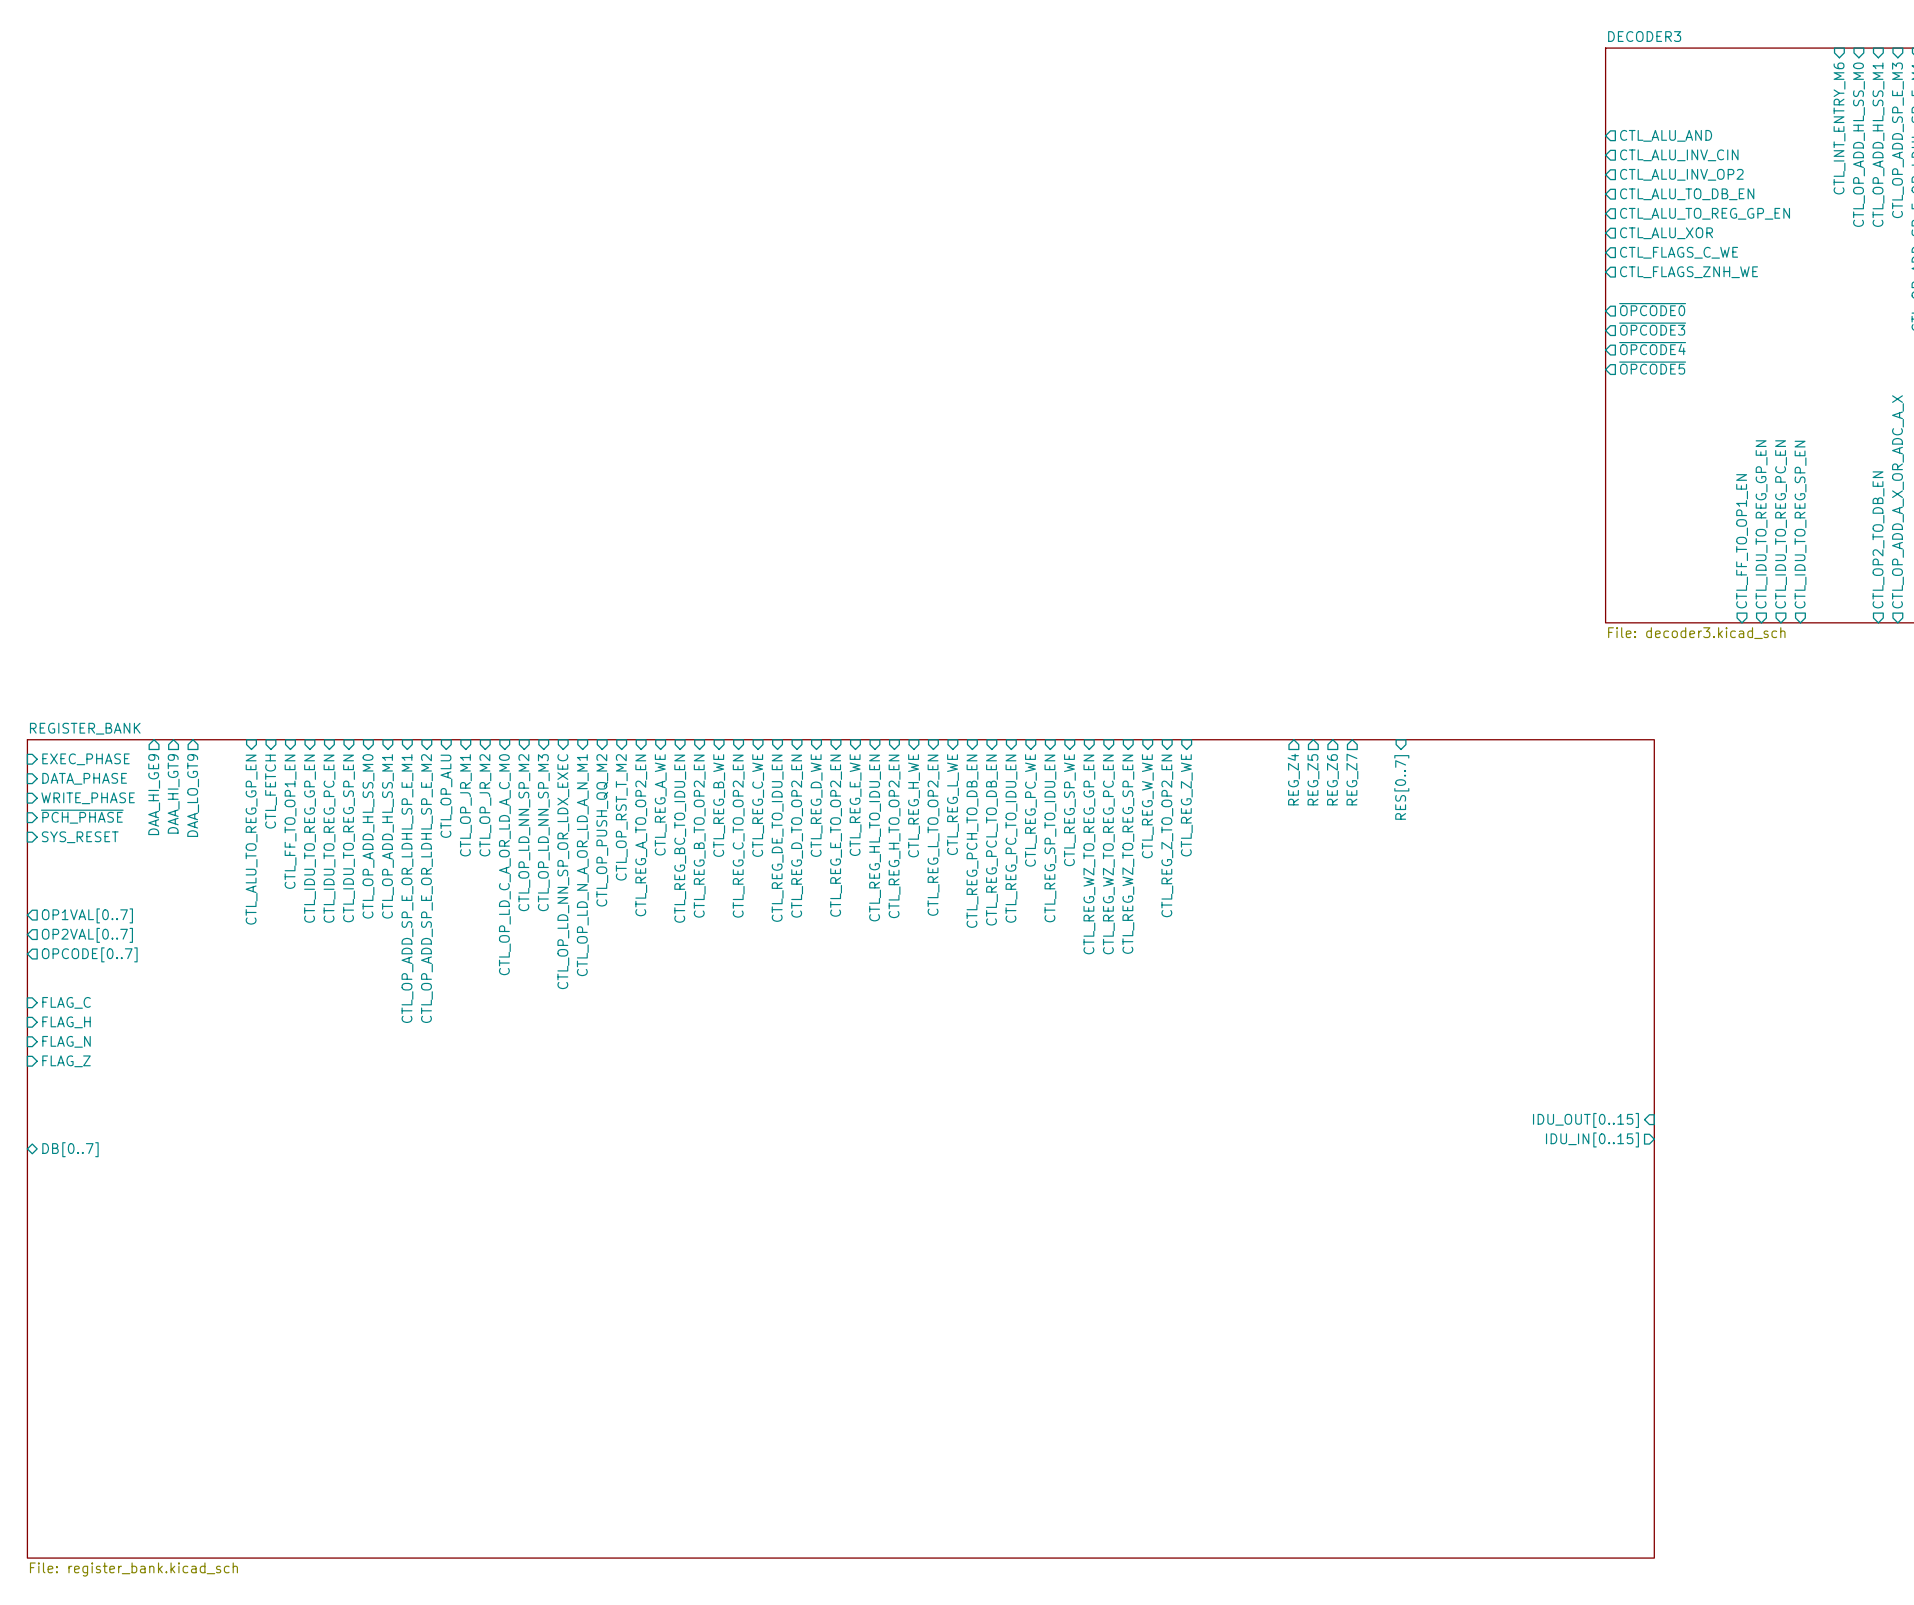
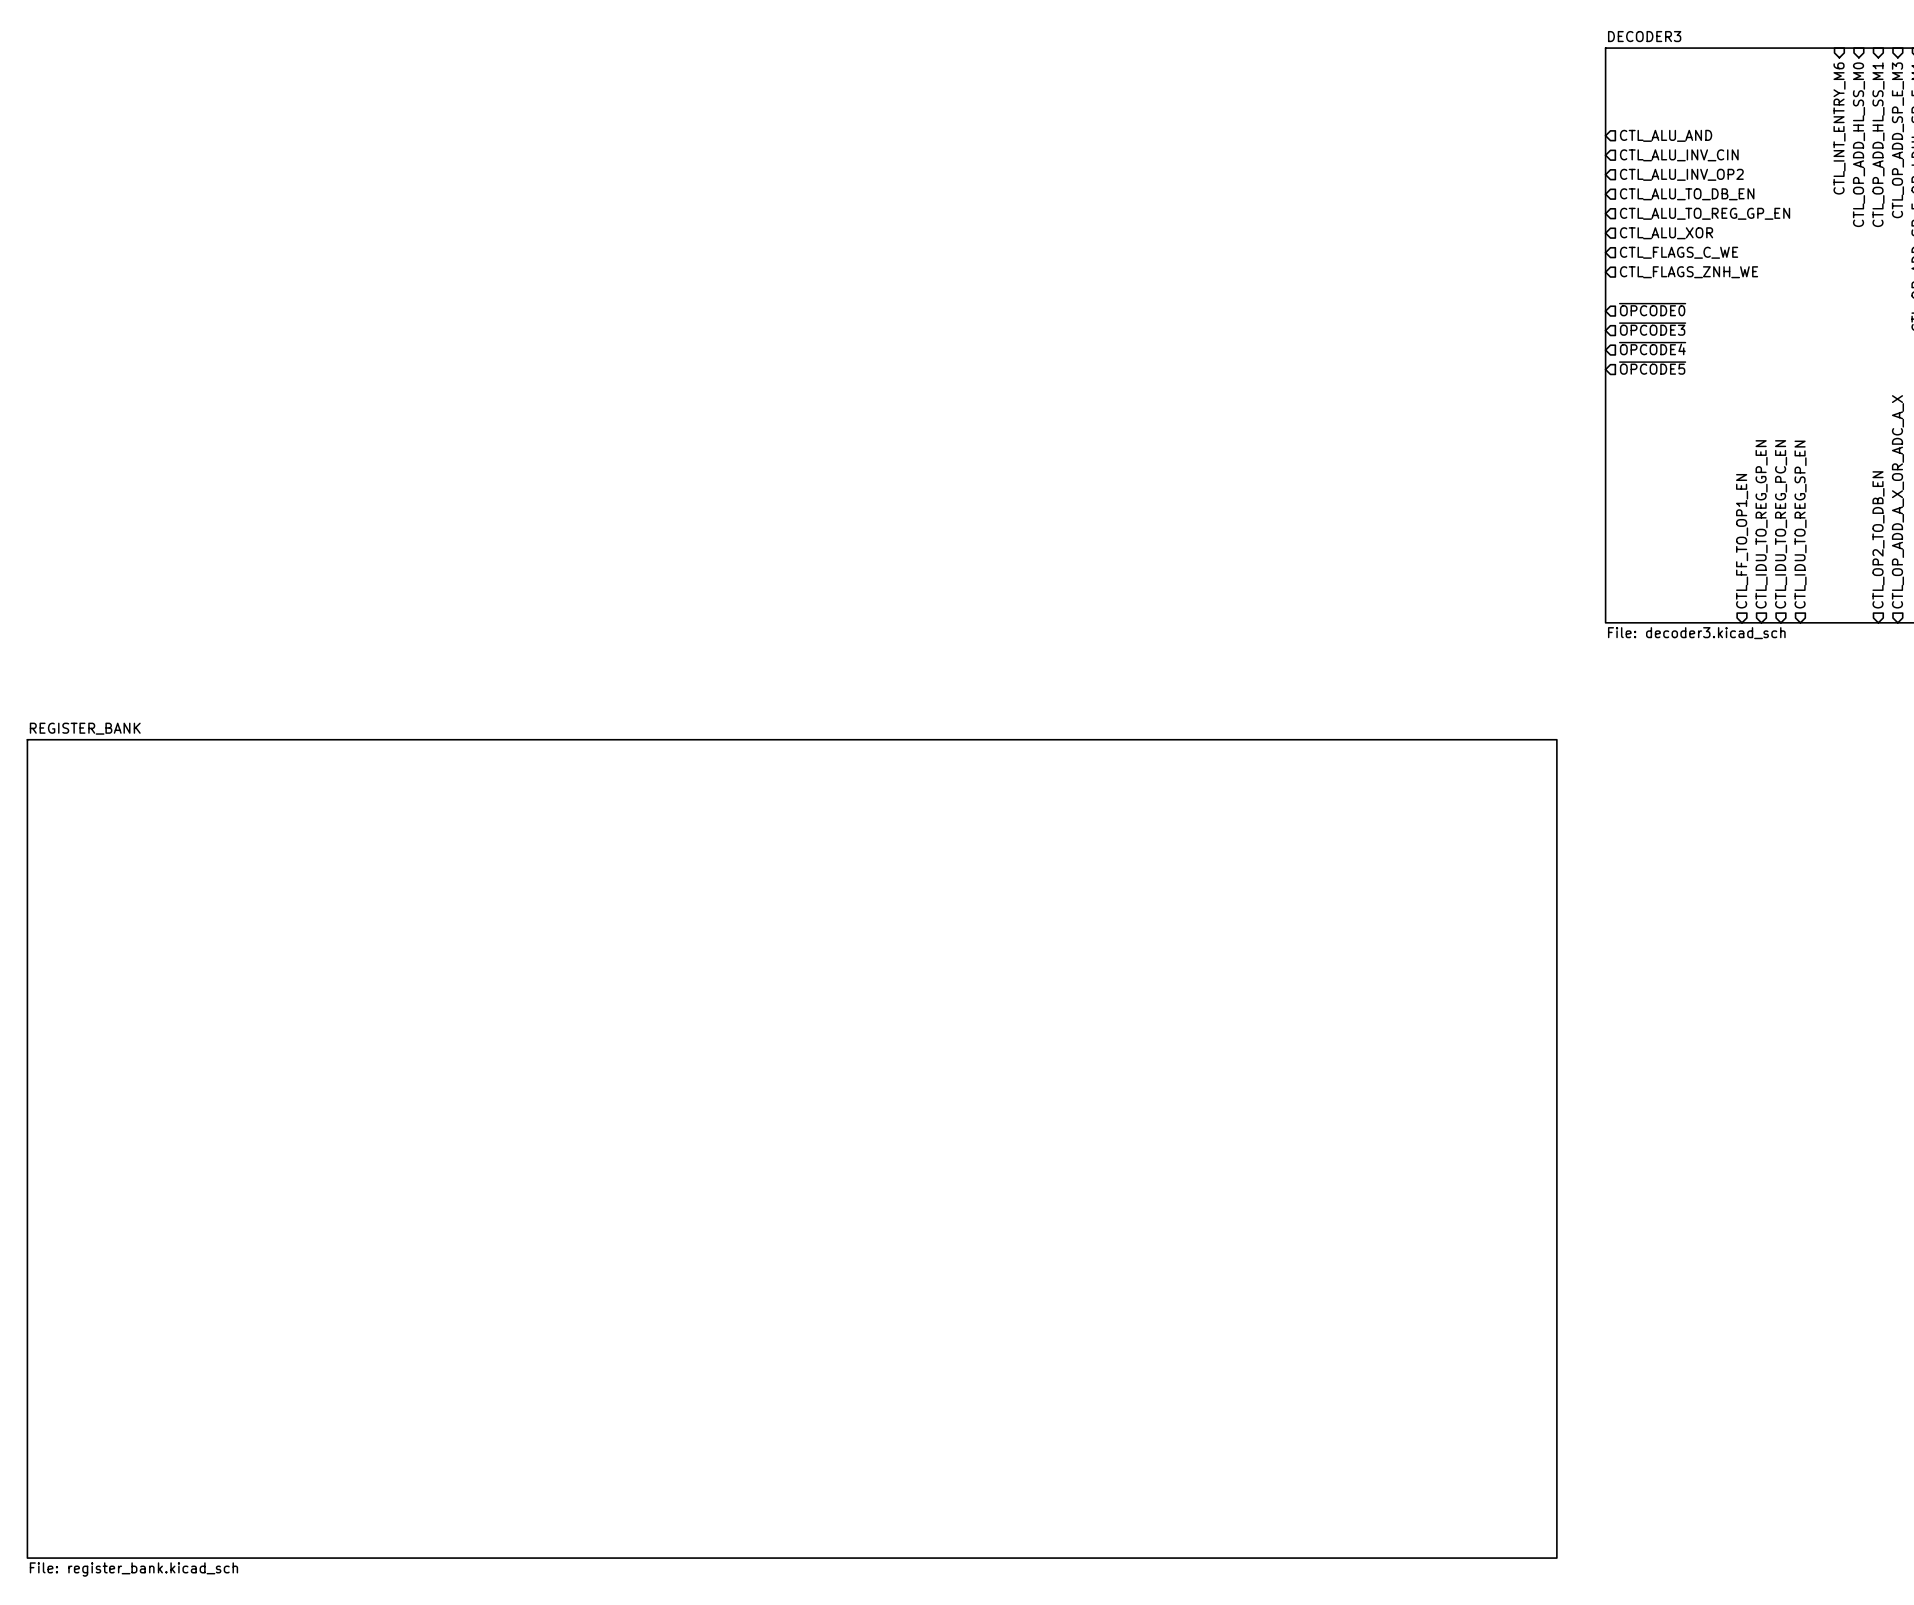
sheet pin: EXEC_PHASE (86, 759) -> none
sheet pin: DATA_PHASE (84, 778) -> none
sheet pin: REG_Z4 (1293, 779) -> none
sheet pin: REG_Z5 (1313, 779) -> none
sheet pin: REG_Z6 (1332, 779) -> none
sheet pin: REG_Z7 (1352, 779) -> none
sheet pin: RES[0..7] (1401, 787) -> none
sheet pin: CTL_FETCH (271, 791) -> none
sheet pin: DAA_HI_GT9 (173, 793) -> none
sheet pin: DAA_HI_GE9 (154, 794) -> none
sheet pin: DAA_LO_GT9 (193, 795) -> none
sheet pin: CTL_OP_ALU (446, 796) -> none
sheet pin: WRITE_PHASE (88, 798) -> none
sheet pin: CTL_REG_A_WE (660, 804) -> none
sheet pin: CTL_REG_L_WE (952, 804) -> none
sheet pin: CTL_OP_JR_M1 (465, 805) -> none
sheet pin: CTL_OP_JR_M2 (485, 805) -> none
sheet pin: CTL_REG_B_WE (719, 805) -> none
sheet pin: CTL_REG_C_WE (758, 805) -> none
sheet pin: CTL_REG_D_WE (816, 805) -> none
sheet pin: CTL_REG_E_WE (855, 805) -> none
sheet pin: CTL_REG_H_WE (914, 805) -> none
sheet pin: CTL_REG_Z_WE (1186, 805) -> none
sheet pin: CTL_REG_W_WE (1147, 806) -> none
sheet pin: CTL_REG_PC_WE (1030, 810) -> none
sheet pin: CTL_REG_SP_WE (1069, 810) -> none
sheet pin: ~{PCH_PHASE} (82, 816) -> none
sheet pin: CTL_OP_RST_T_M2 (621, 817) -> none
sheet pin: CTL_FF_TO_OP1_EN (290, 821) -> none
sheet pin: CTL_OP_PUSH_QQ_M2 (602, 830) -> none
sheet pin: CTL_OP_LD_NN_SP_M2 (524, 832) -> none
sheet pin: CTL_OP_LD_NN_SP_M3 (543, 832) -> none
sheet pin: CTL_REG_A_TO_OP2_EN (641, 835) -> none
sheet pin: CTL_REG_E_TO_OP2_EN (836, 835) -> none
sheet pin: CTL_REG_L_TO_OP2_EN (933, 835) -> none
sheet pin: CTL_REG_Z_TO_OP2_EN (1167, 835) -> none
sheet pin: CTL_OP_ADD_HL_SS_M0 (368, 836) -> none
sheet pin: CTL_OP_ADD_HL_SS_M1 (387, 836) -> none
sheet pin: CTL_REG_B_TO_OP2_EN (699, 836) -> none
sheet pin: CTL_REG_C_TO_OP2_EN (738, 836) -> none
sheet pin: CTL_REG_D_TO_OP2_EN (797, 836) -> none
sheet pin: CTL_REG_H_TO_OP2_EN (894, 836) -> none
sheet pin: SYS_RESET (80, 837) -> none
sheet pin: CTL_IDU_TO_REG_GP_EN (310, 838) -> none
sheet pin: CTL_IDU_TO_REG_PC_EN (329, 838) -> none
sheet pin: CTL_IDU_TO_REG_SP_EN (348, 838) -> none
sheet pin: CTL_REG_BC_TO_IDU_EN (680, 838) -> none
sheet pin: CTL_REG_DE_TO_IDU_EN (777, 838) -> none
sheet pin: CTL_REG_HL_TO_IDU_EN (875, 838) -> none
sheet pin: CTL_REG_PC_TO_IDU_EN (1011, 838) -> none
sheet pin: CTL_REG_SP_TO_IDU_EN (1050, 838) -> none
sheet pin: CTL_ALU_TO_REG_GP_EN (251, 839) -> none
sheet pin: CTL_REG_PCL_TO_DB_EN (991, 840) -> none
sheet pin: CTL_REG_PCH_TO_DB_EN (972, 841) -> none
sheet pin: CTL_REG_WZ_TO_REG_GP_EN (1089, 854) -> none
sheet pin: CTL_REG_WZ_TO_REG_PC_EN (1108, 854) -> none
sheet pin: CTL_REG_WZ_TO_REG_SP_EN (1128, 854) -> none
sheet pin: CTL_OP_LD_C_A_OR_LD_A_C_M0 (504, 864) -> none
sheet pin: CTL_OP_LD_N_A_OR_LD_A_N_M1 (582, 865) -> none
sheet pin: CTL_OP_LD_NN_SP_OR_LDX_EXEC (563, 871) -> none
sheet pin: CTL_OP_ADD_SP_E_OR_LDHL_SP_E_M1 (407, 888) -> none
sheet pin: CTL_OP_ADD_SP_E_OR_LDHL_SP_E_M2 (426, 888) -> none
sheet pin: OP1VAL[0..7] (87, 915) -> none
sheet pin: OP2VAL[0..7] (87, 935) -> none
sheet pin: OPCODE[0..7] (89, 954) -> none
sheet pin: FLAG_C (66, 1002) -> none
sheet pin: FLAG_H (66, 1022) -> none
sheet pin: FLAG_N (66, 1041) -> none
sheet pin: FLAG_Z (66, 1061) -> none
sheet pin: IDU_OUT[0..15] (1585, 1120) -> none
sheet pin: IDU_IN[0..15] (1592, 1139) -> none
sheet REGISTER_BANK: none -> File: register_bank.kicad_sch (792, 1148)
sheet REGISTER_BANK: File: register_bank.kicad_sch (840, 1148) -> none
sheet pin: DB[0..7] (70, 1149) -> none

